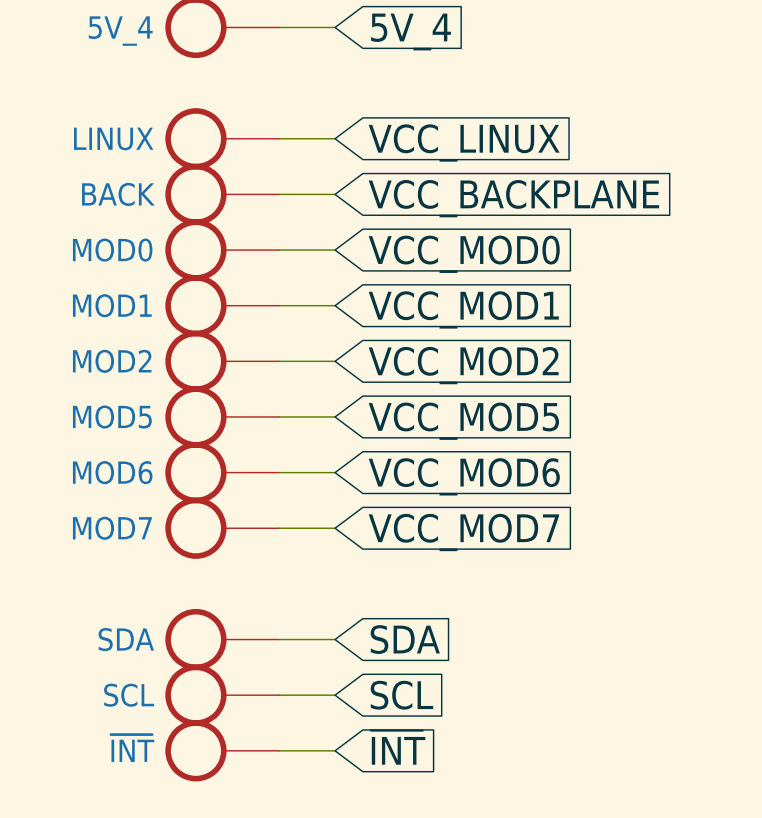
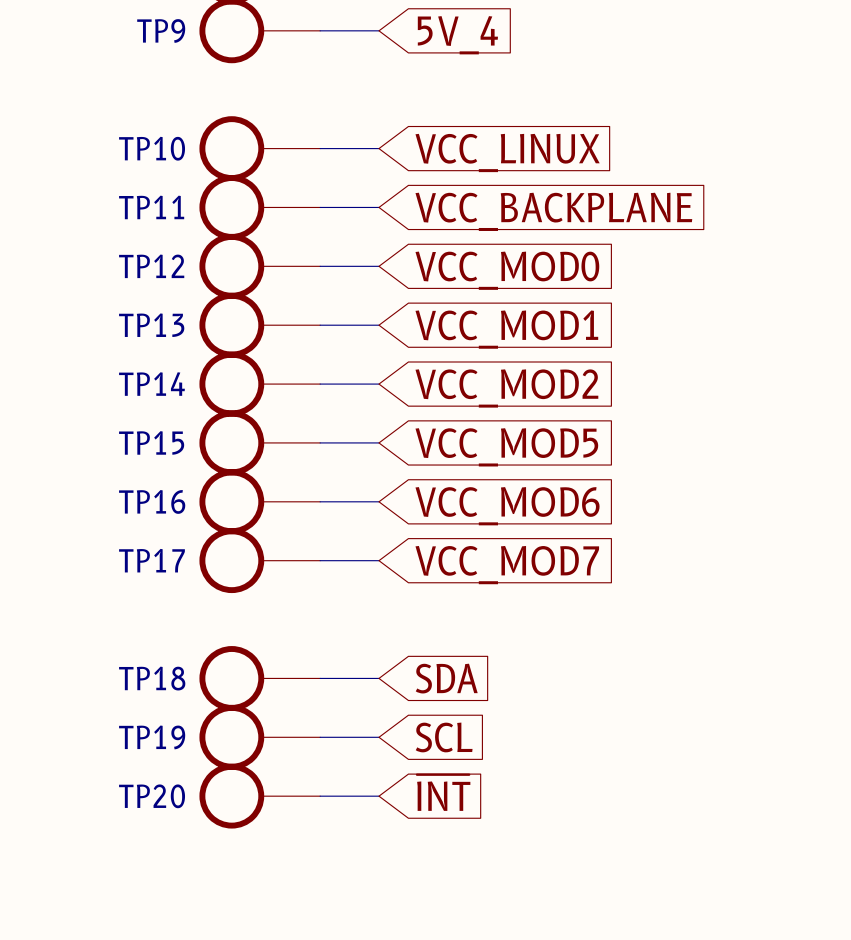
5V_4 name: 5V_4 (120, 31) -> TP9 (161, 30)
LINUX name: LINUX (113, 138) -> TP10 (152, 148)
BACK name: BACK (118, 194) -> TP11 (151, 207)
MOD0 name: MOD0 (112, 250) -> TP12 (151, 266)
MOD1 name: MOD1 (112, 305) -> TP13 (151, 325)
MOD2 name: MOD2 (112, 361) -> TP14 (151, 384)
MOD5 name: MOD5 (112, 416) -> TP15 (151, 442)
MOD6 name: MOD6 (112, 472) -> TP16 (152, 501)
MOD7 name: MOD7 (112, 528) -> TP17 (151, 560)
SDA name: SDA (126, 639) -> TP18 (152, 678)
SCL name: SCL (129, 695) -> TP19 (152, 737)
~{INT} name: ~{INT} (132, 748) -> TP20 (152, 796)

